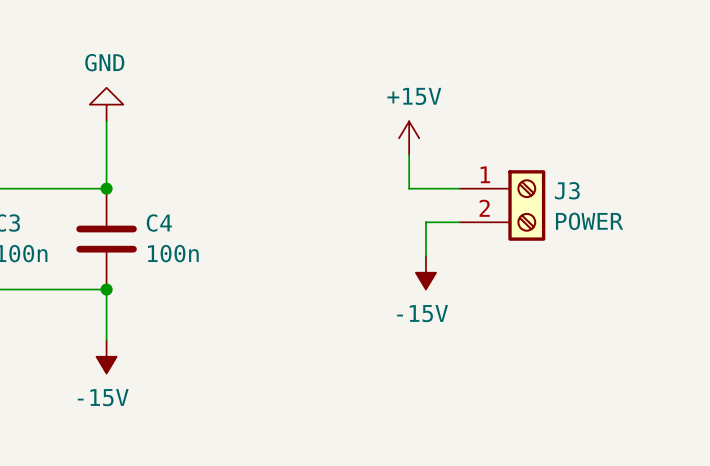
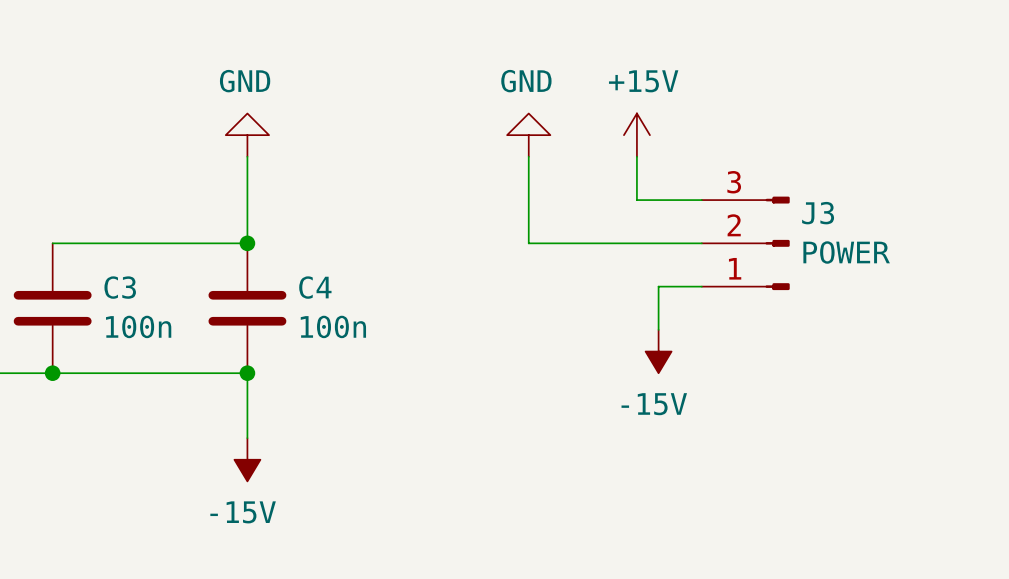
power symbol: none -> GND (528, 135)
wire: none -> (636, 156) (636, 200) (701, 200)
power symbol position: +15V (409, 138) -> +15V (636, 135)
wire: (409, 155) (409, 188) -> (528, 156) (528, 243) (636, 243)
J3 symbol: [459, 170, 546, 241] -> [701, 196, 790, 291]

